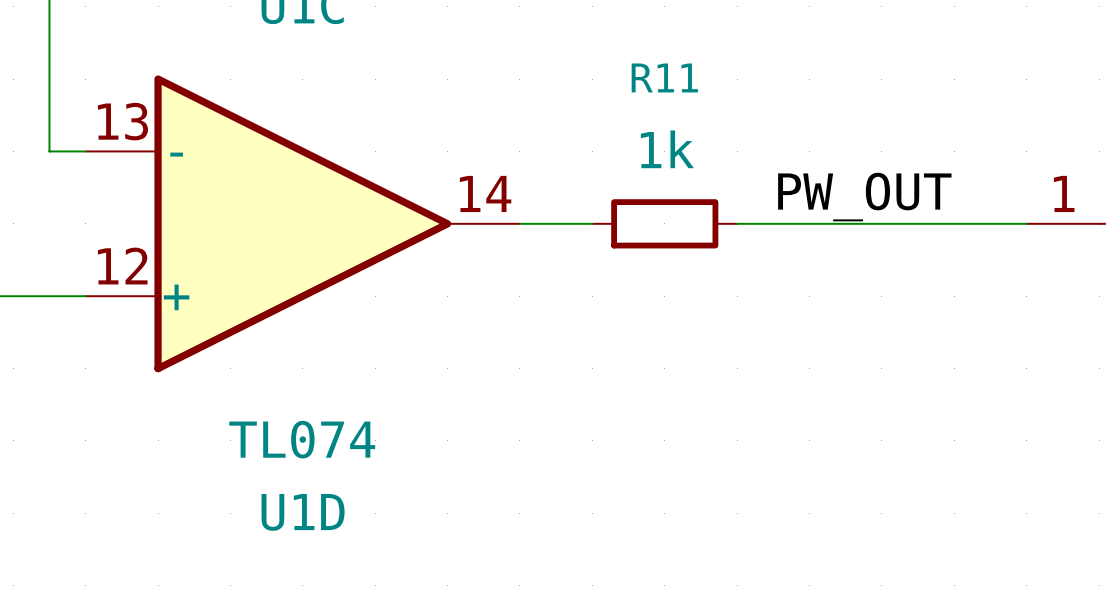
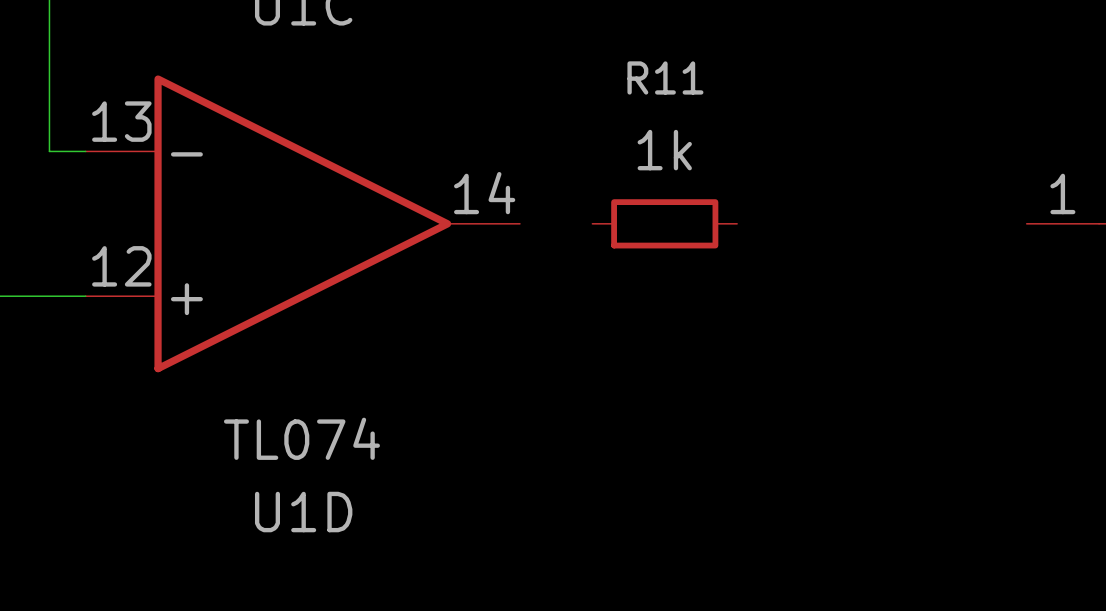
label: PW_OUT (864, 197) -> none
wire: (519, 223) (592, 223) -> none
wire: (737, 223) (1026, 223) -> none

